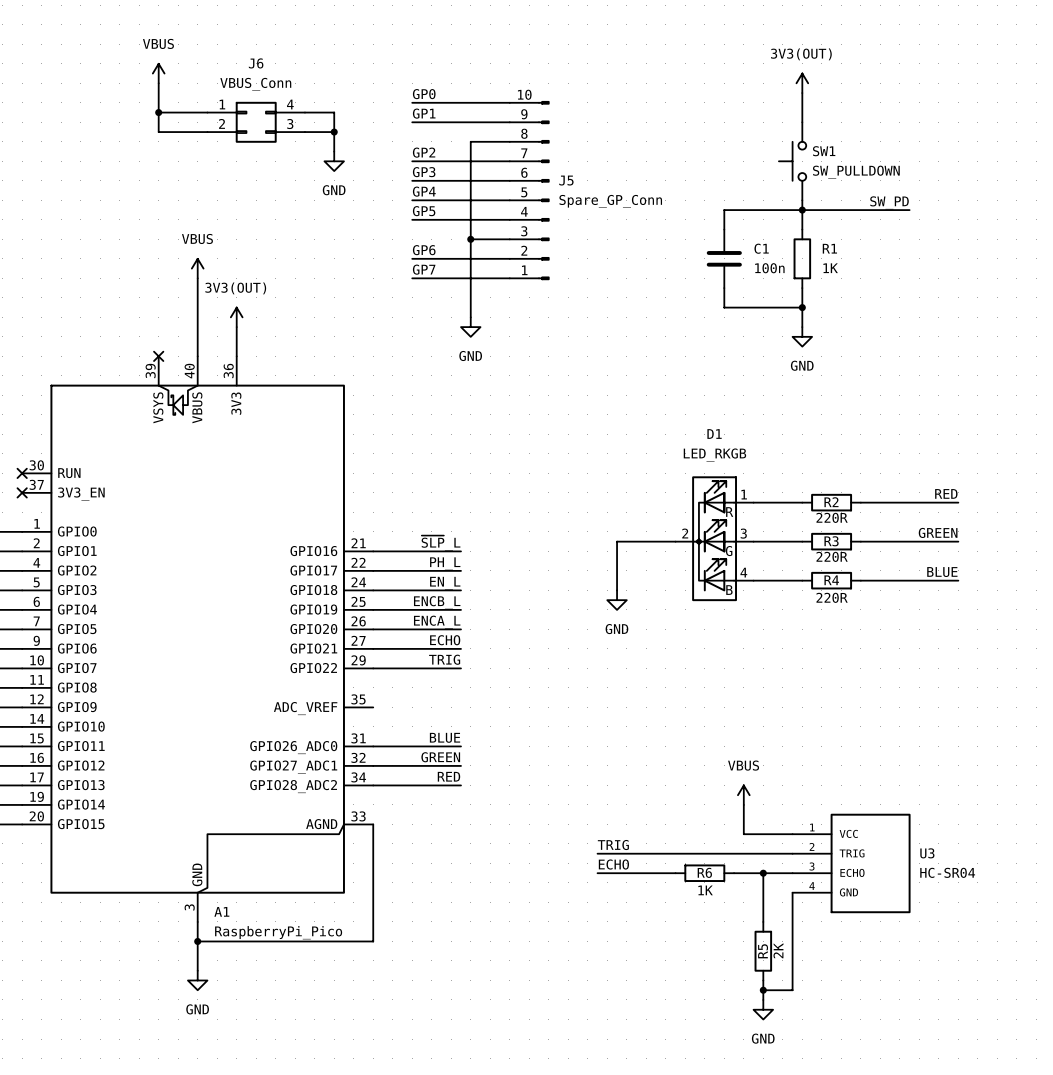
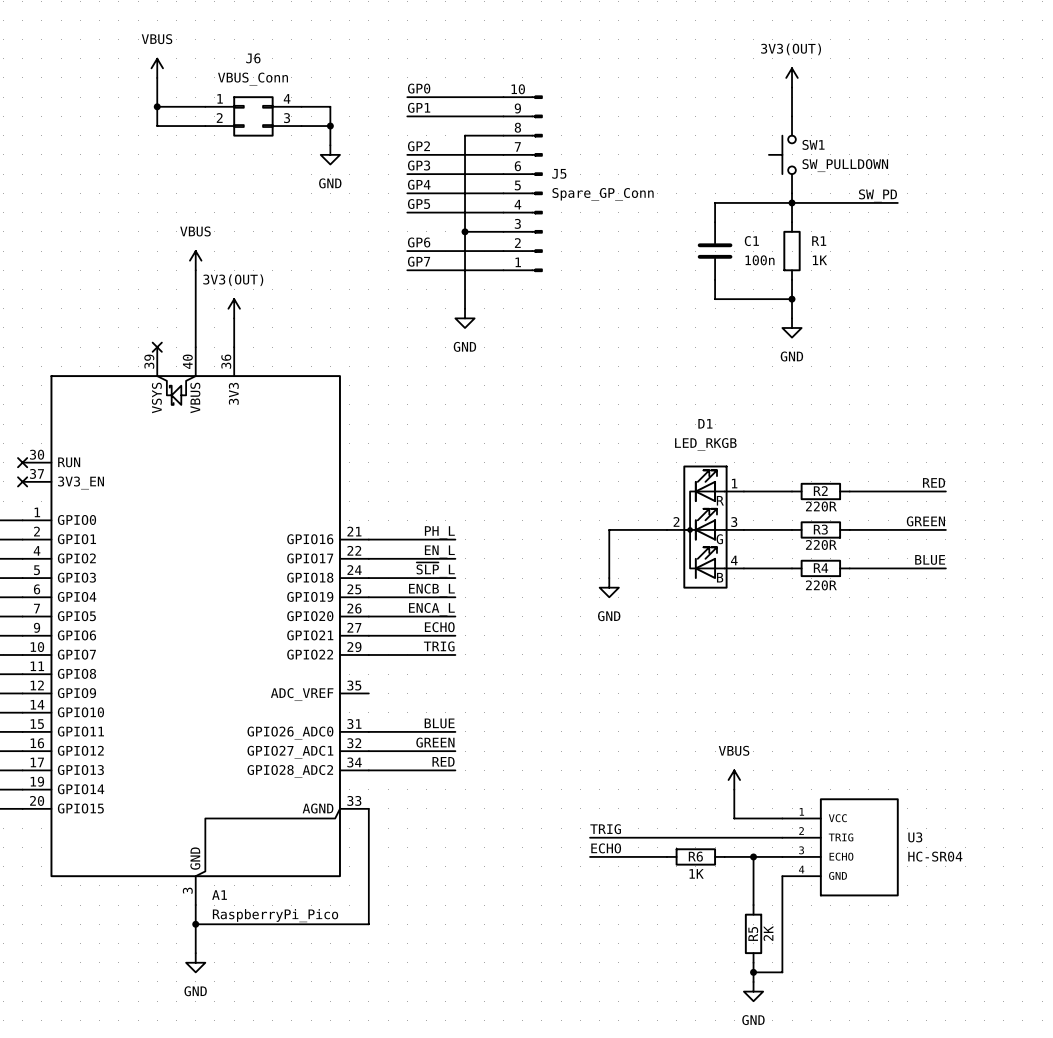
label: ~{SLP}_L (441, 543) -> PH_L (439, 532)
label: PH_L (445, 563) -> EN_L (439, 551)
label: EN_L (445, 583) -> ~{SLP}_L (435, 569)

